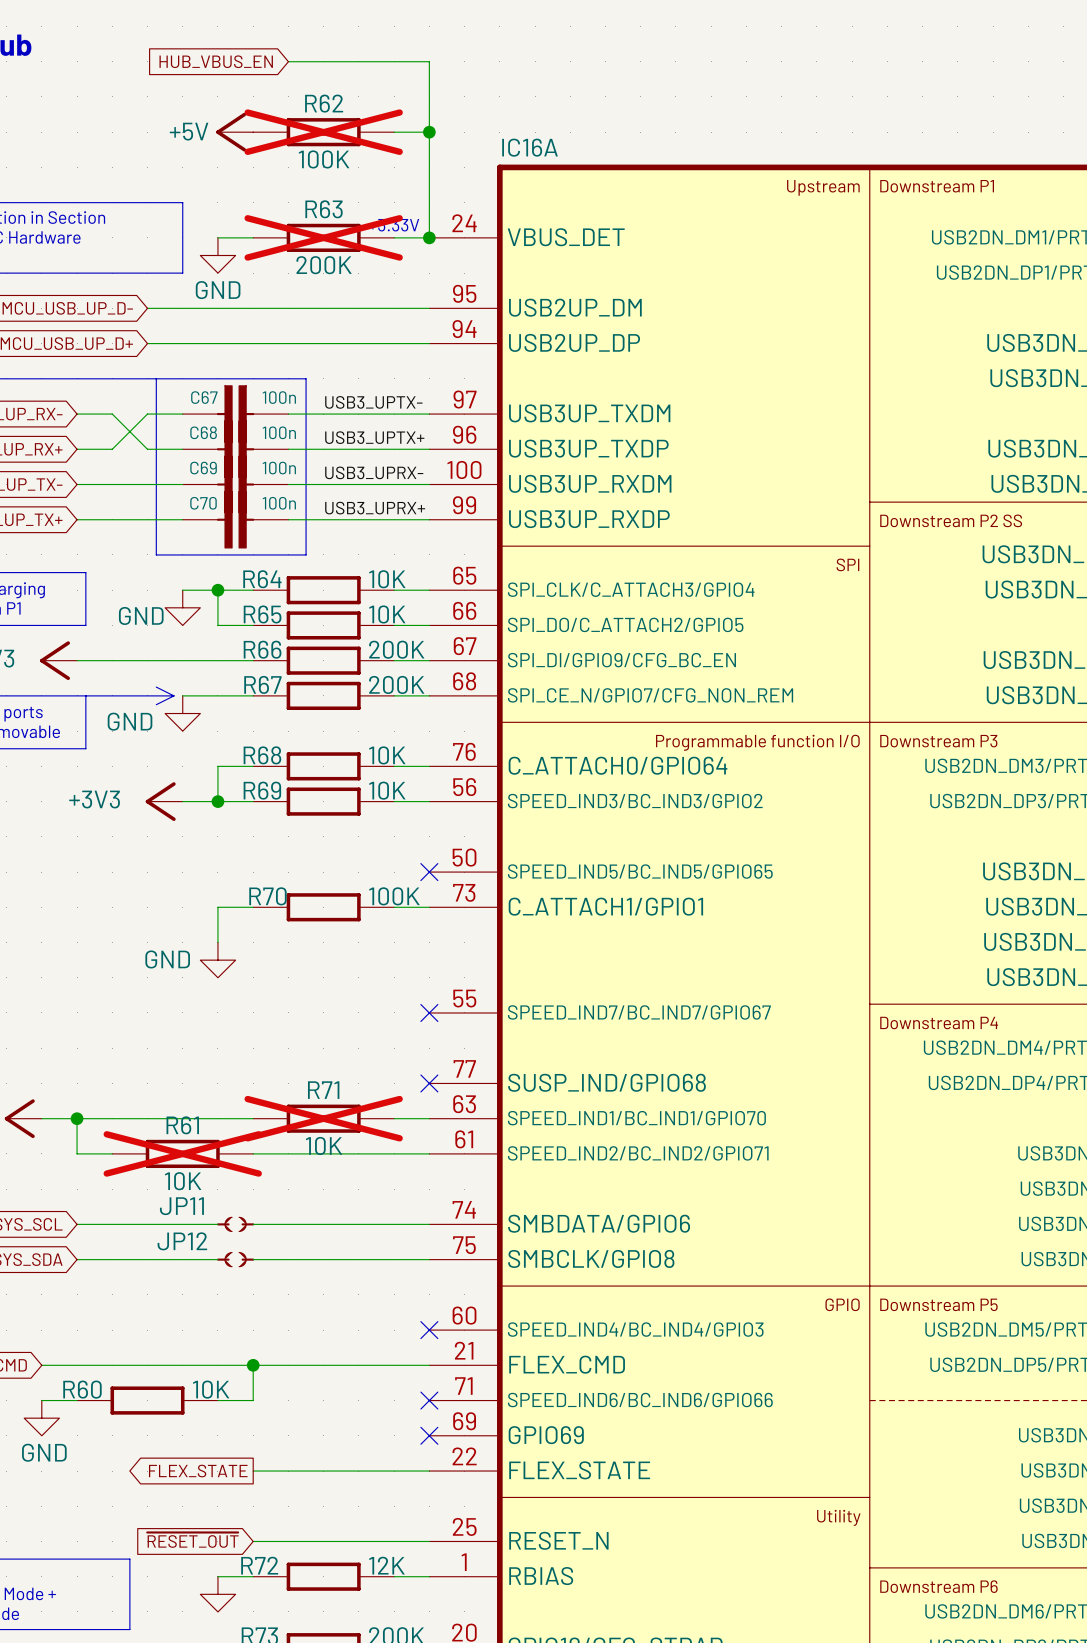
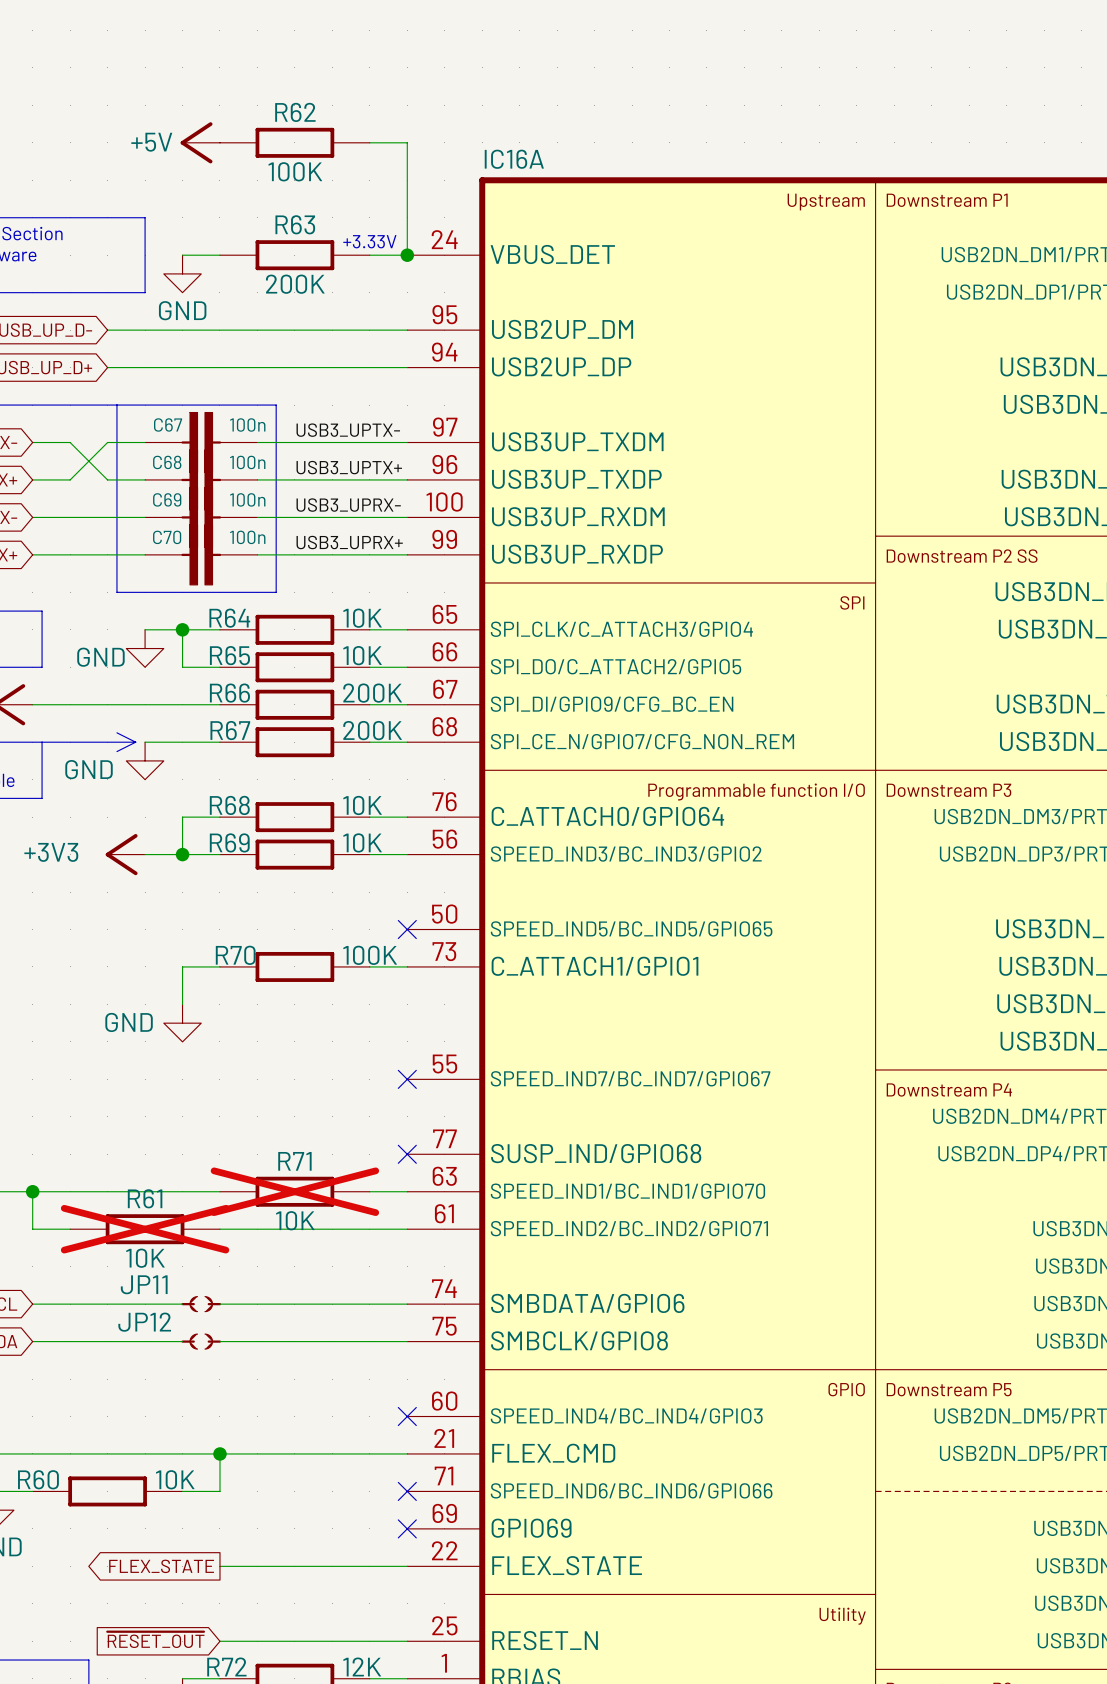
global label: HUB_VBUS_EN (216, 61) -> none
wire: (288, 61) (429, 61) (429, 132) -> none
R62 do-not-place cross: (323, 132) -> none
junction: (429, 132) -> none
R63 do-not-place cross: (323, 237) -> none

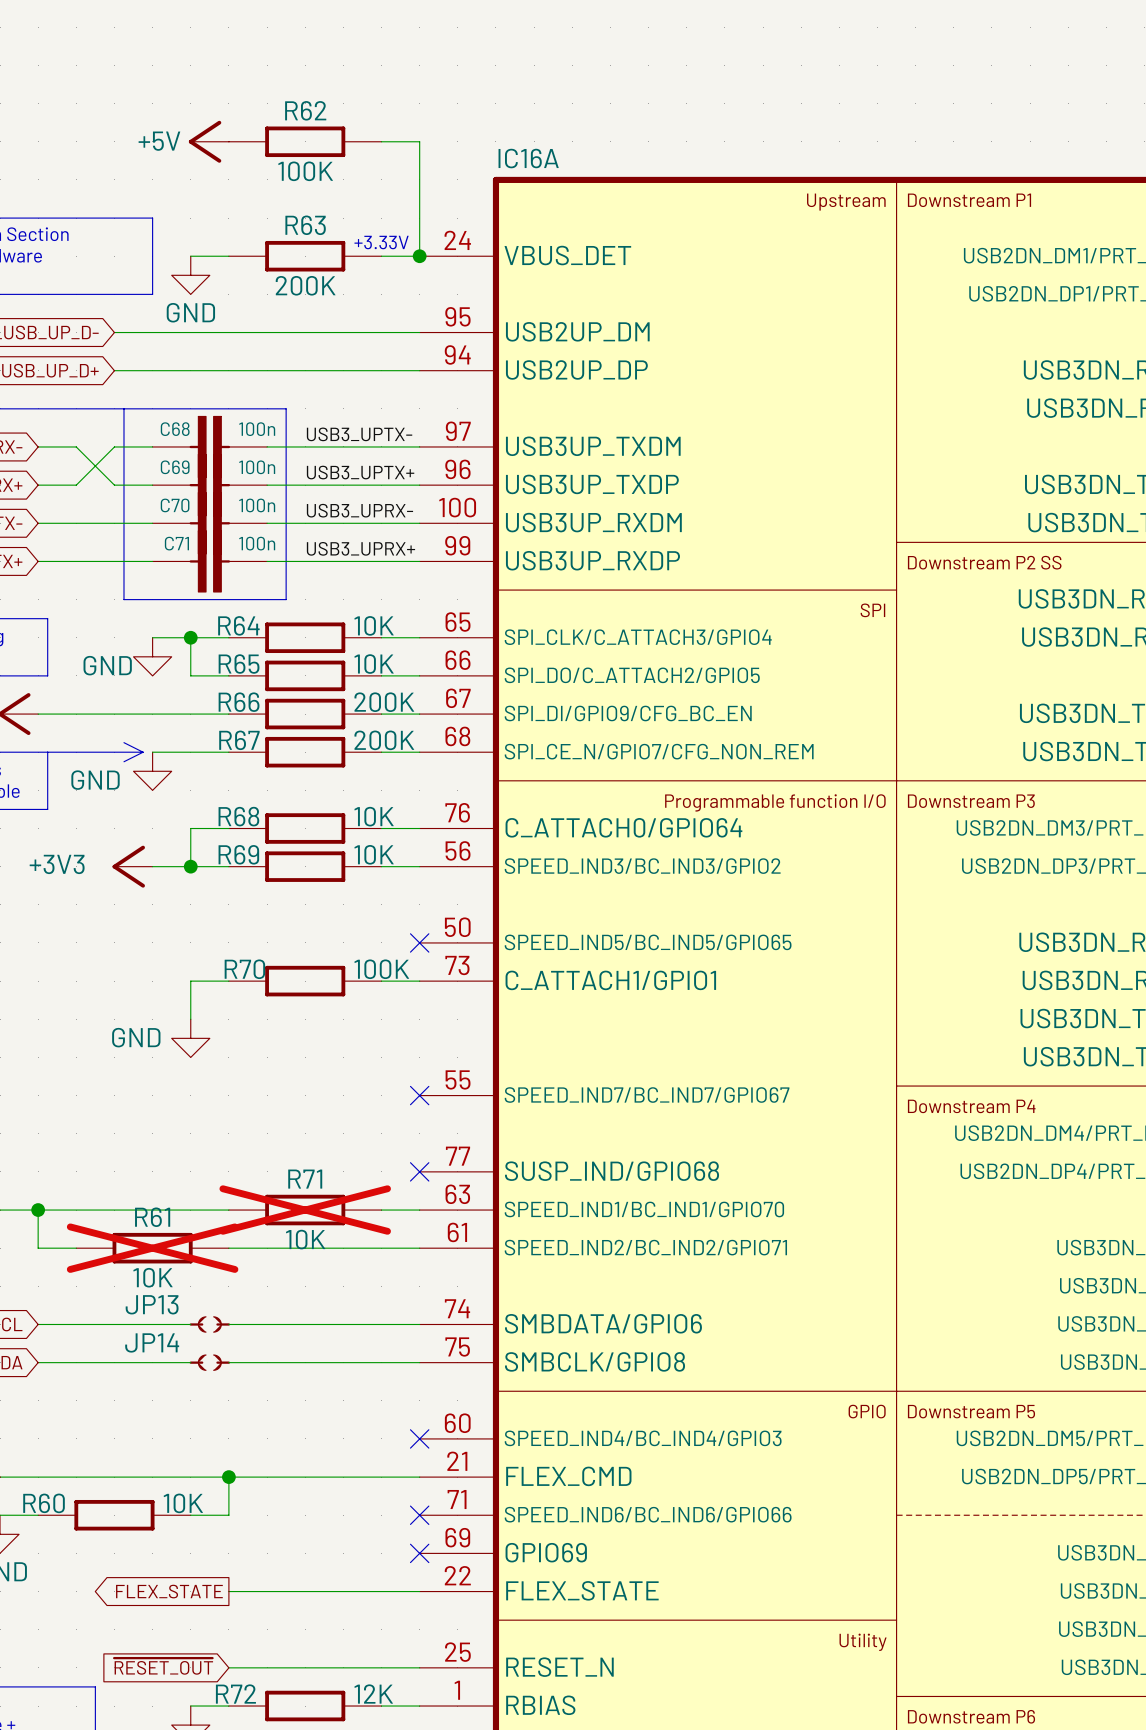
C67 name: C67 (168, 424) -> C68 (175, 429)
C68 name: C68 (167, 462) -> C69 (175, 467)
C69 name: C69 (167, 499) -> C70 (175, 505)
C70 name: C70 (167, 537) -> C71 (176, 543)
JP11 name: JP11 (144, 1284) -> JP13 (152, 1304)
JP12 name: JP12 (144, 1322) -> JP14 (152, 1342)

